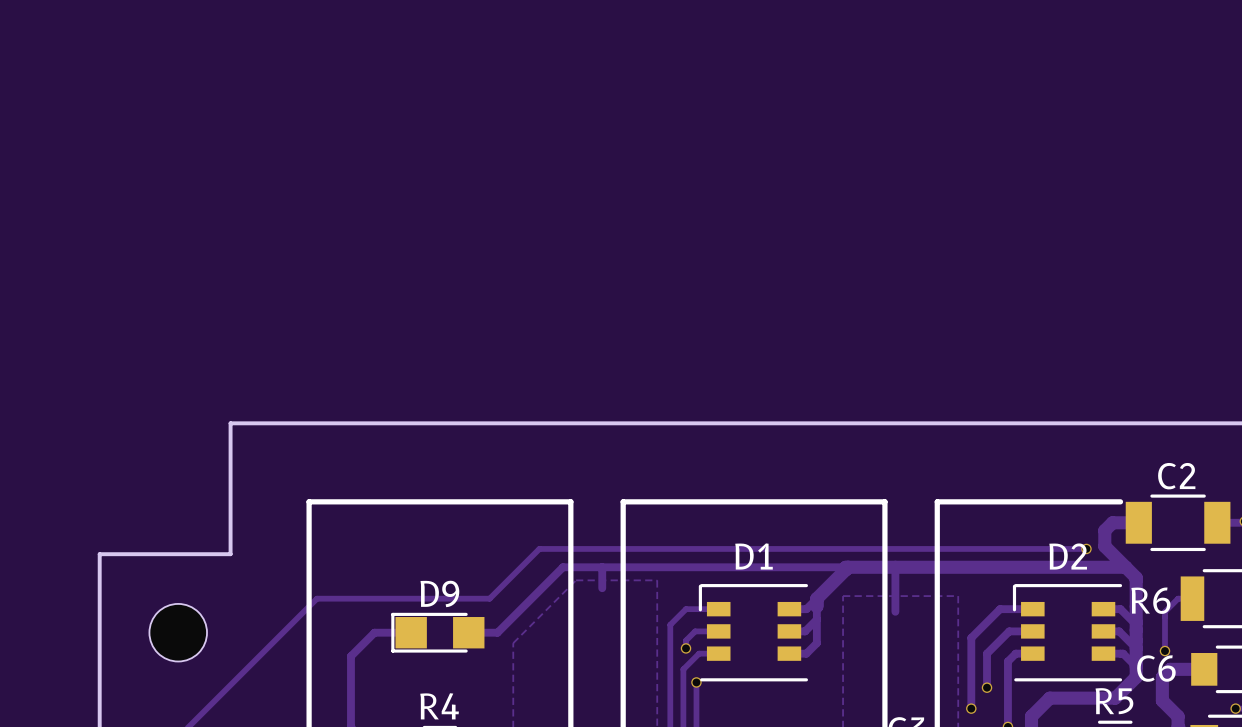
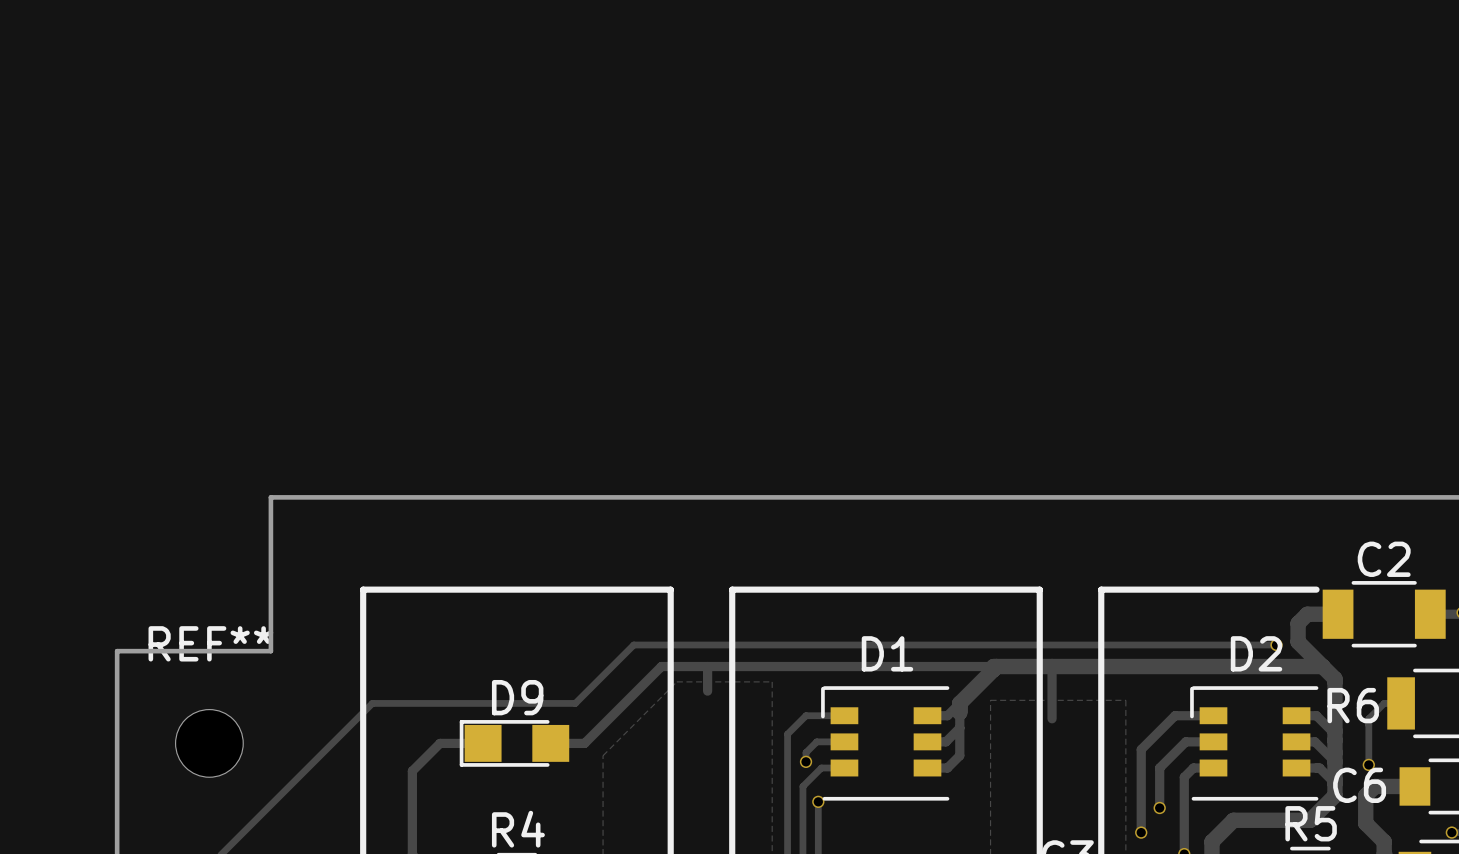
REF** name: none -> REF** (210, 643)

